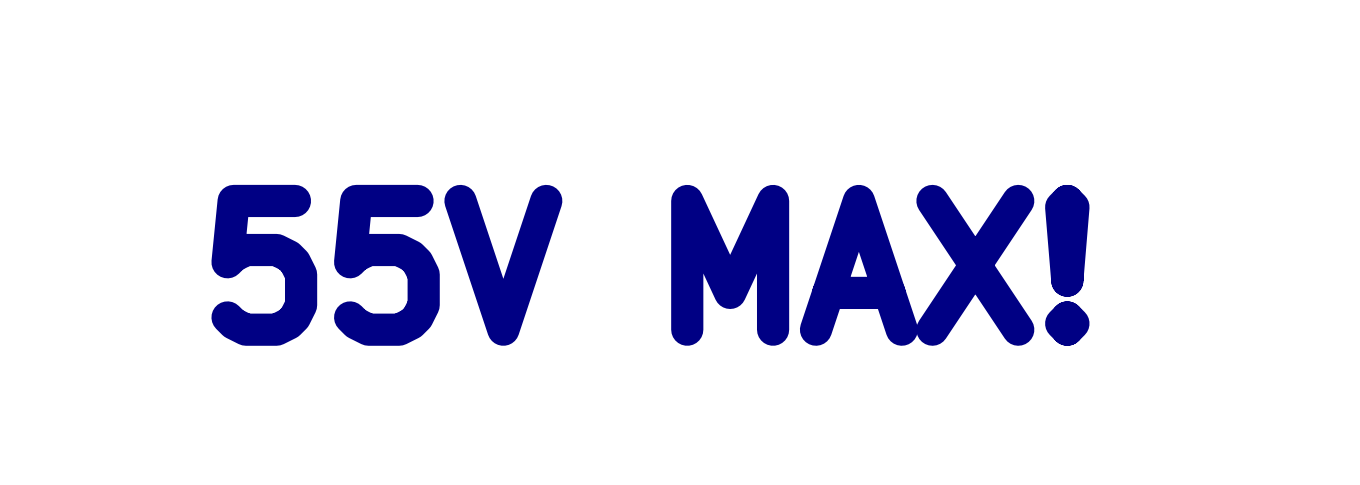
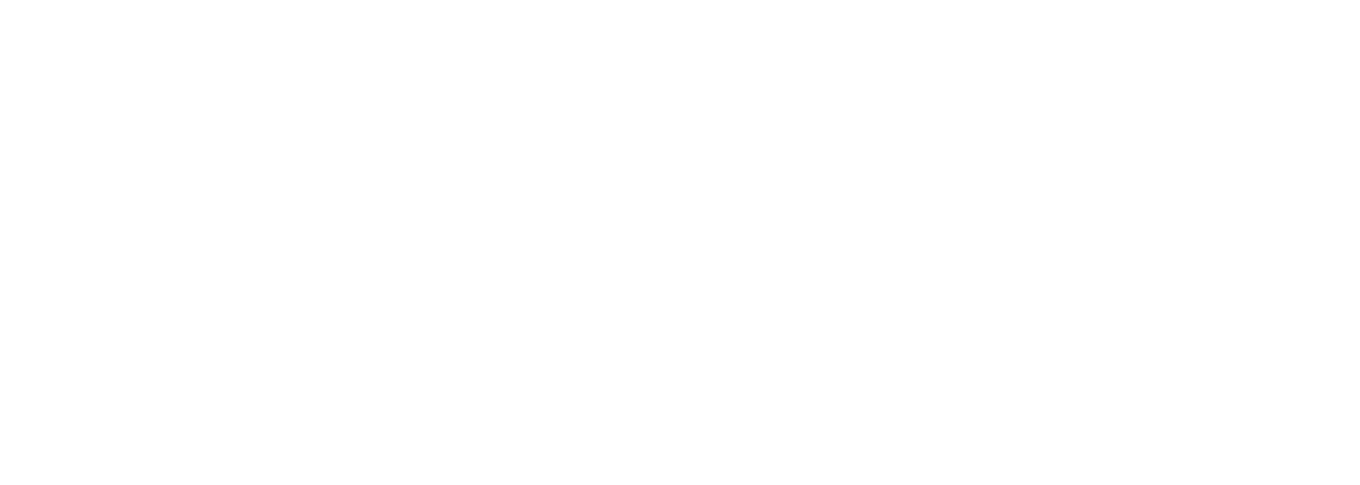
text: 55V MAX! (650, 265) -> none

